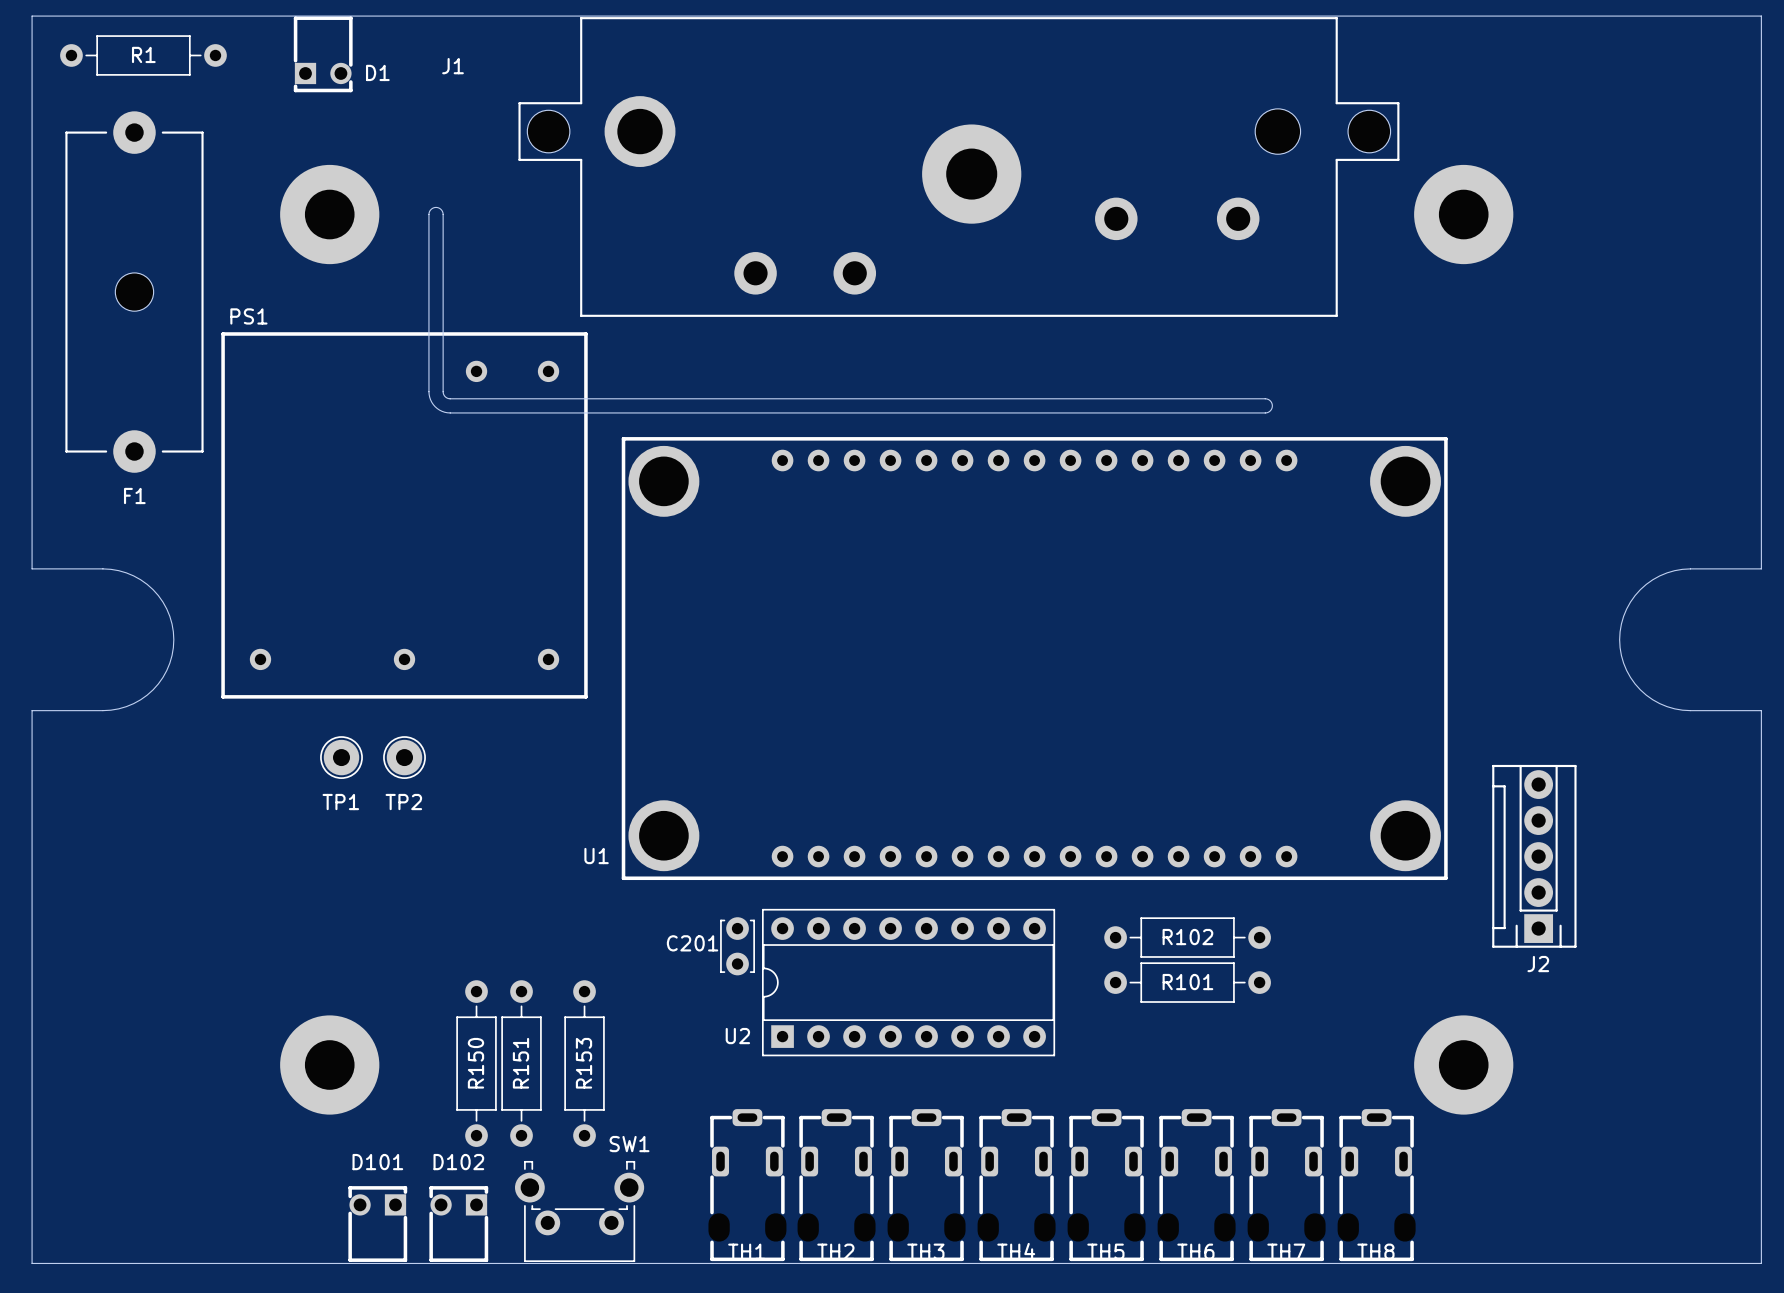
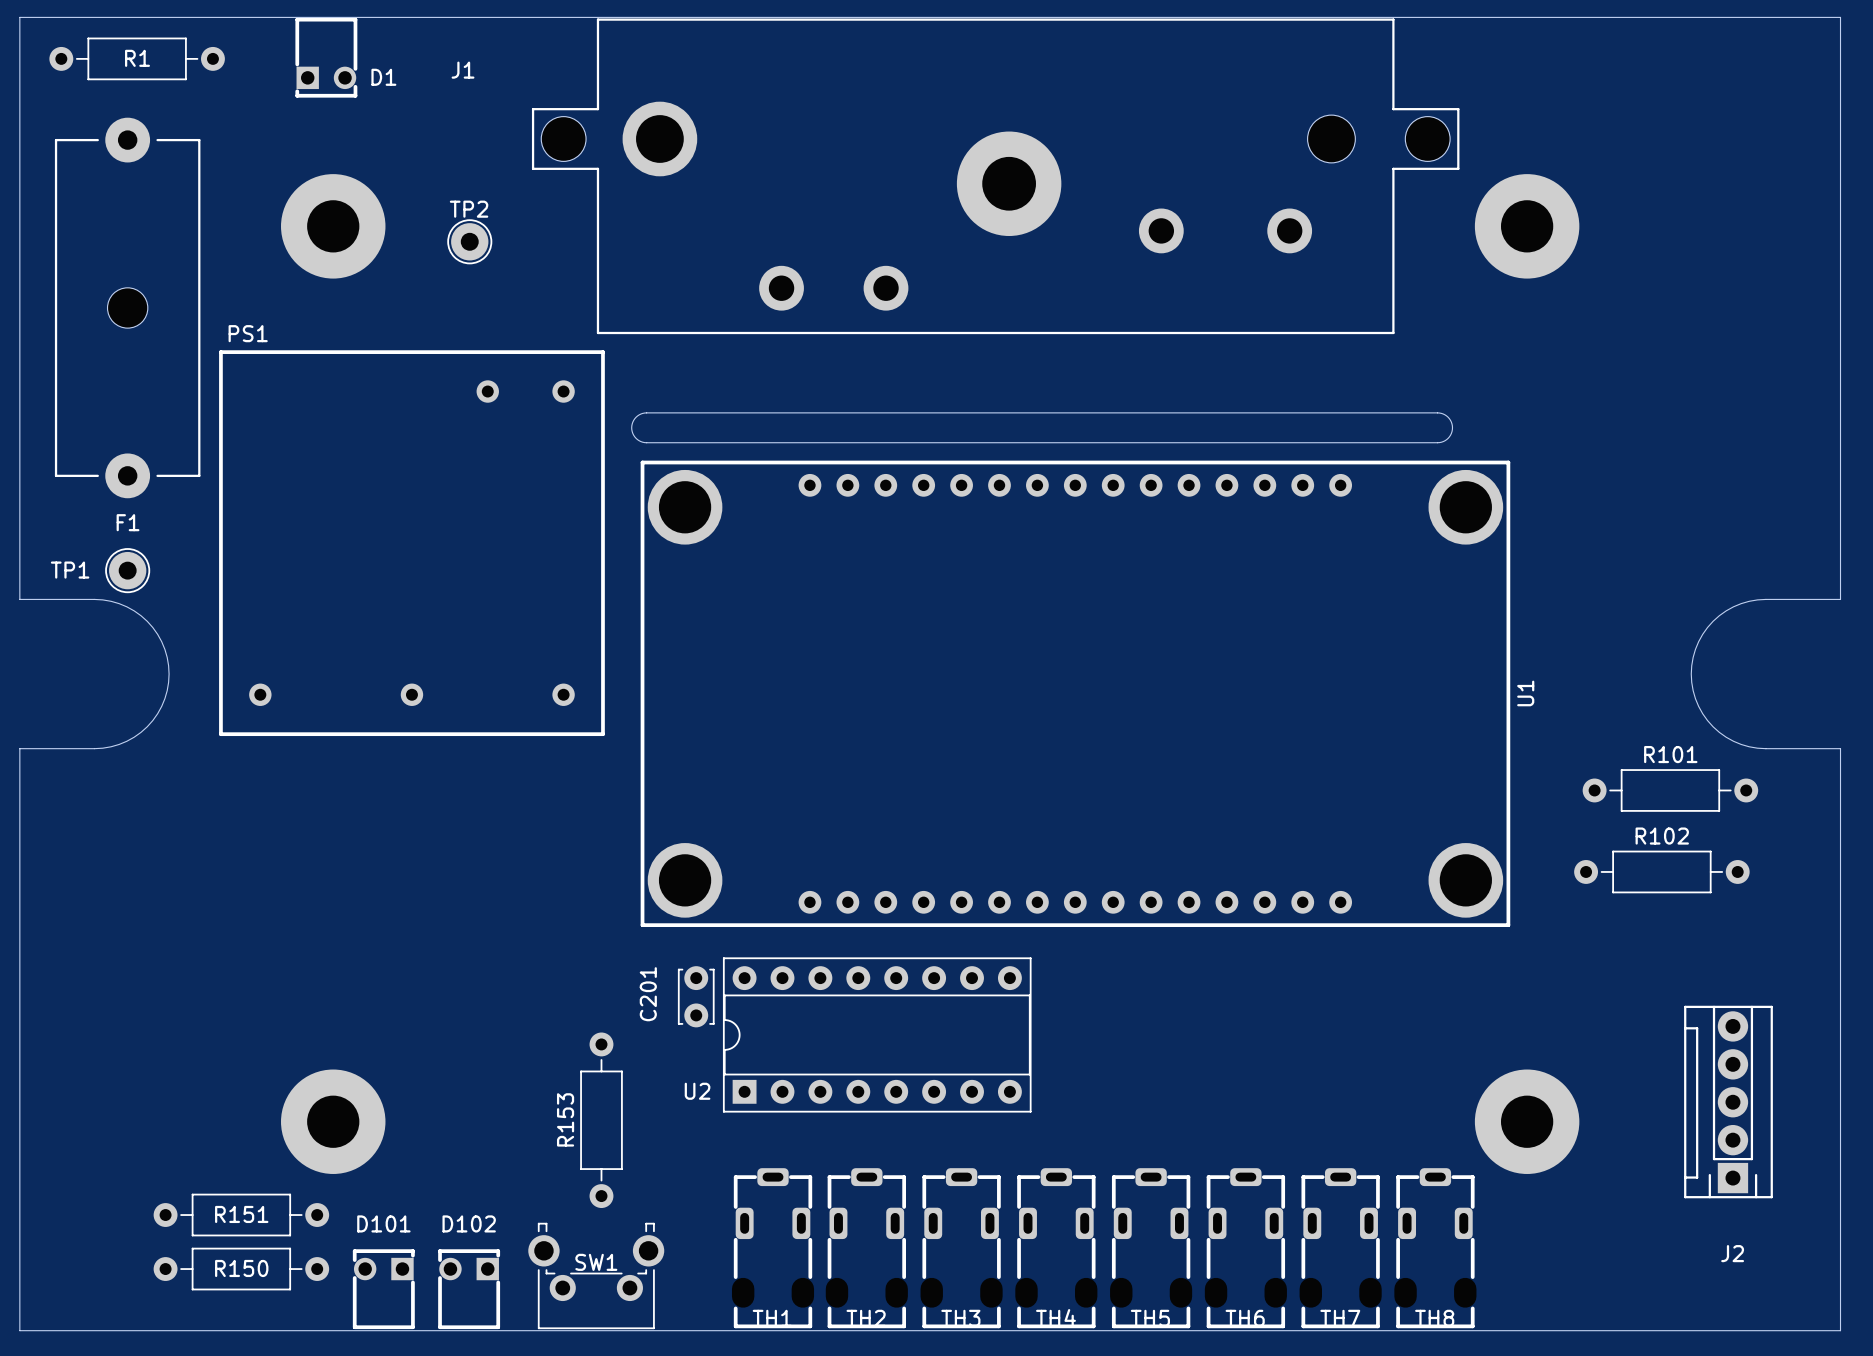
board edge: (428, 214) (429, 394) (435, 406) (444, 412) (1265, 412) (1272, 407) (1270, 401) (1265, 398) (448, 398) (443, 391) (443, 213) (441, 209) (436, 207) (431, 209) (428, 214) -> none
board edge: none -> (646, 412) (1437, 412) (1448, 417) (1452, 427) (1448, 438) (1437, 442) (646, 442) (636, 438) (631, 427) (636, 417) (646, 412)
TP1 position: (341, 757) -> (127, 570)
TP2 position: (404, 757) -> (469, 241)
TP1 name position: TP1 (340, 802) -> TP1 (70, 570)
TP2 name position: TP2 (403, 802) -> TP2 (469, 209)
U1 name rotation: 0° (596, 856) -> 90° counterclockwise (1525, 693)
U1 name position: U1 (596, 856) -> U1 (1525, 693)
J2 position: (1534, 856) -> (1728, 1102)
R102 position: (1187, 937) -> (1661, 871)
R102 name position: R102 (1187, 937) -> R102 (1662, 836)
C201 name rotation: 0° (692, 943) -> 90° counterclockwise (648, 994)
C201 position: (737, 946) -> (696, 996)
J2 name position: J2 (1538, 964) -> J2 (1732, 1253)
U2 position: (908, 982) -> (877, 1034)
R101 position: (1187, 982) -> (1670, 790)
R101 name position: R101 (1187, 982) -> R101 (1670, 754)
R150 rotation: 0° (476, 1063) -> 90° clockwise (241, 1269)
R150 position: (476, 1063) -> (241, 1269)
R151 rotation: 0° (521, 1063) -> 90° clockwise (241, 1215)
R151 position: (521, 1063) -> (241, 1215)
R153 name position: R153 (583, 1063) -> R153 (565, 1119)
SW1 name position: SW1 (629, 1144) -> SW1 (596, 1262)

